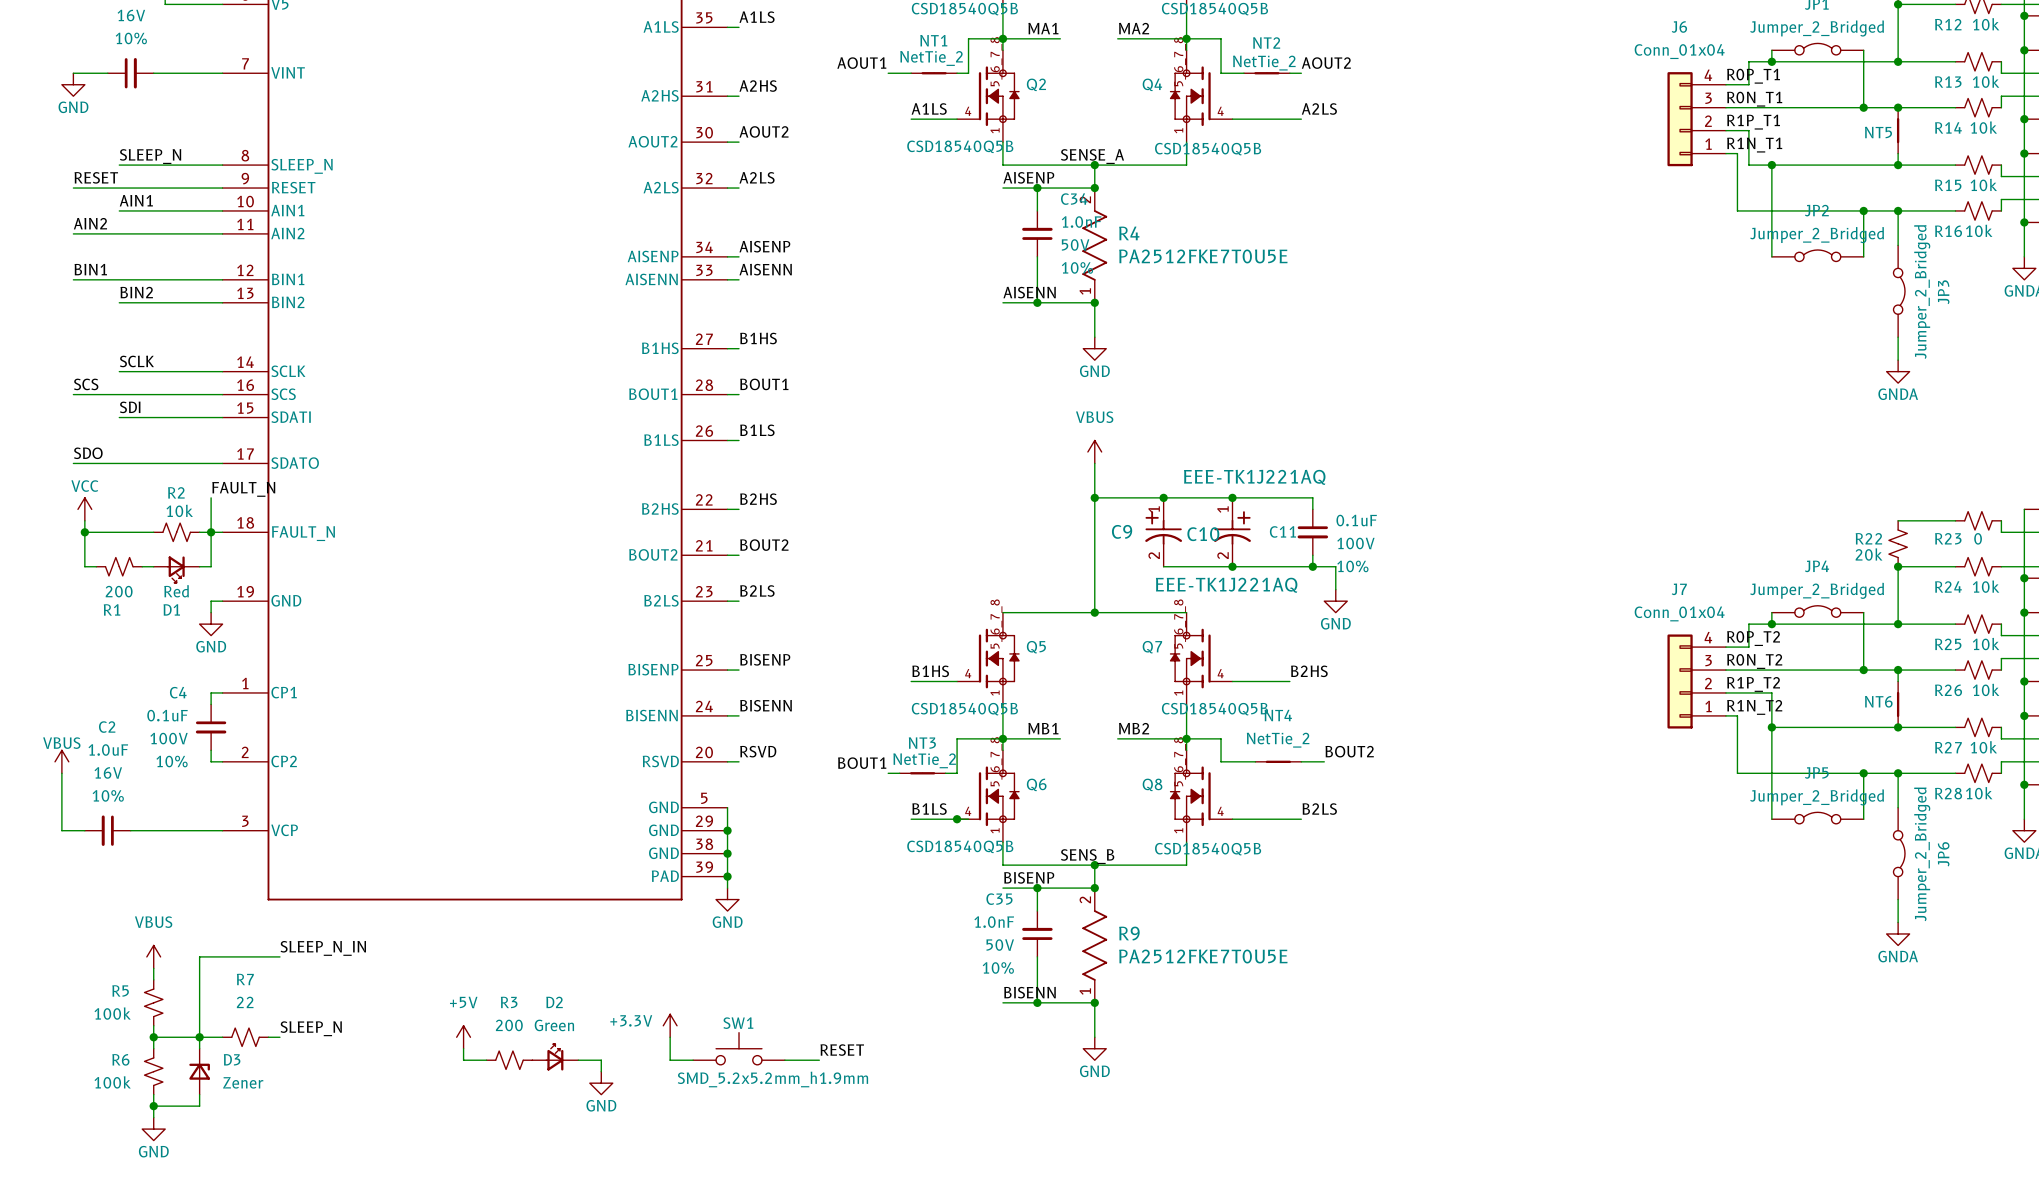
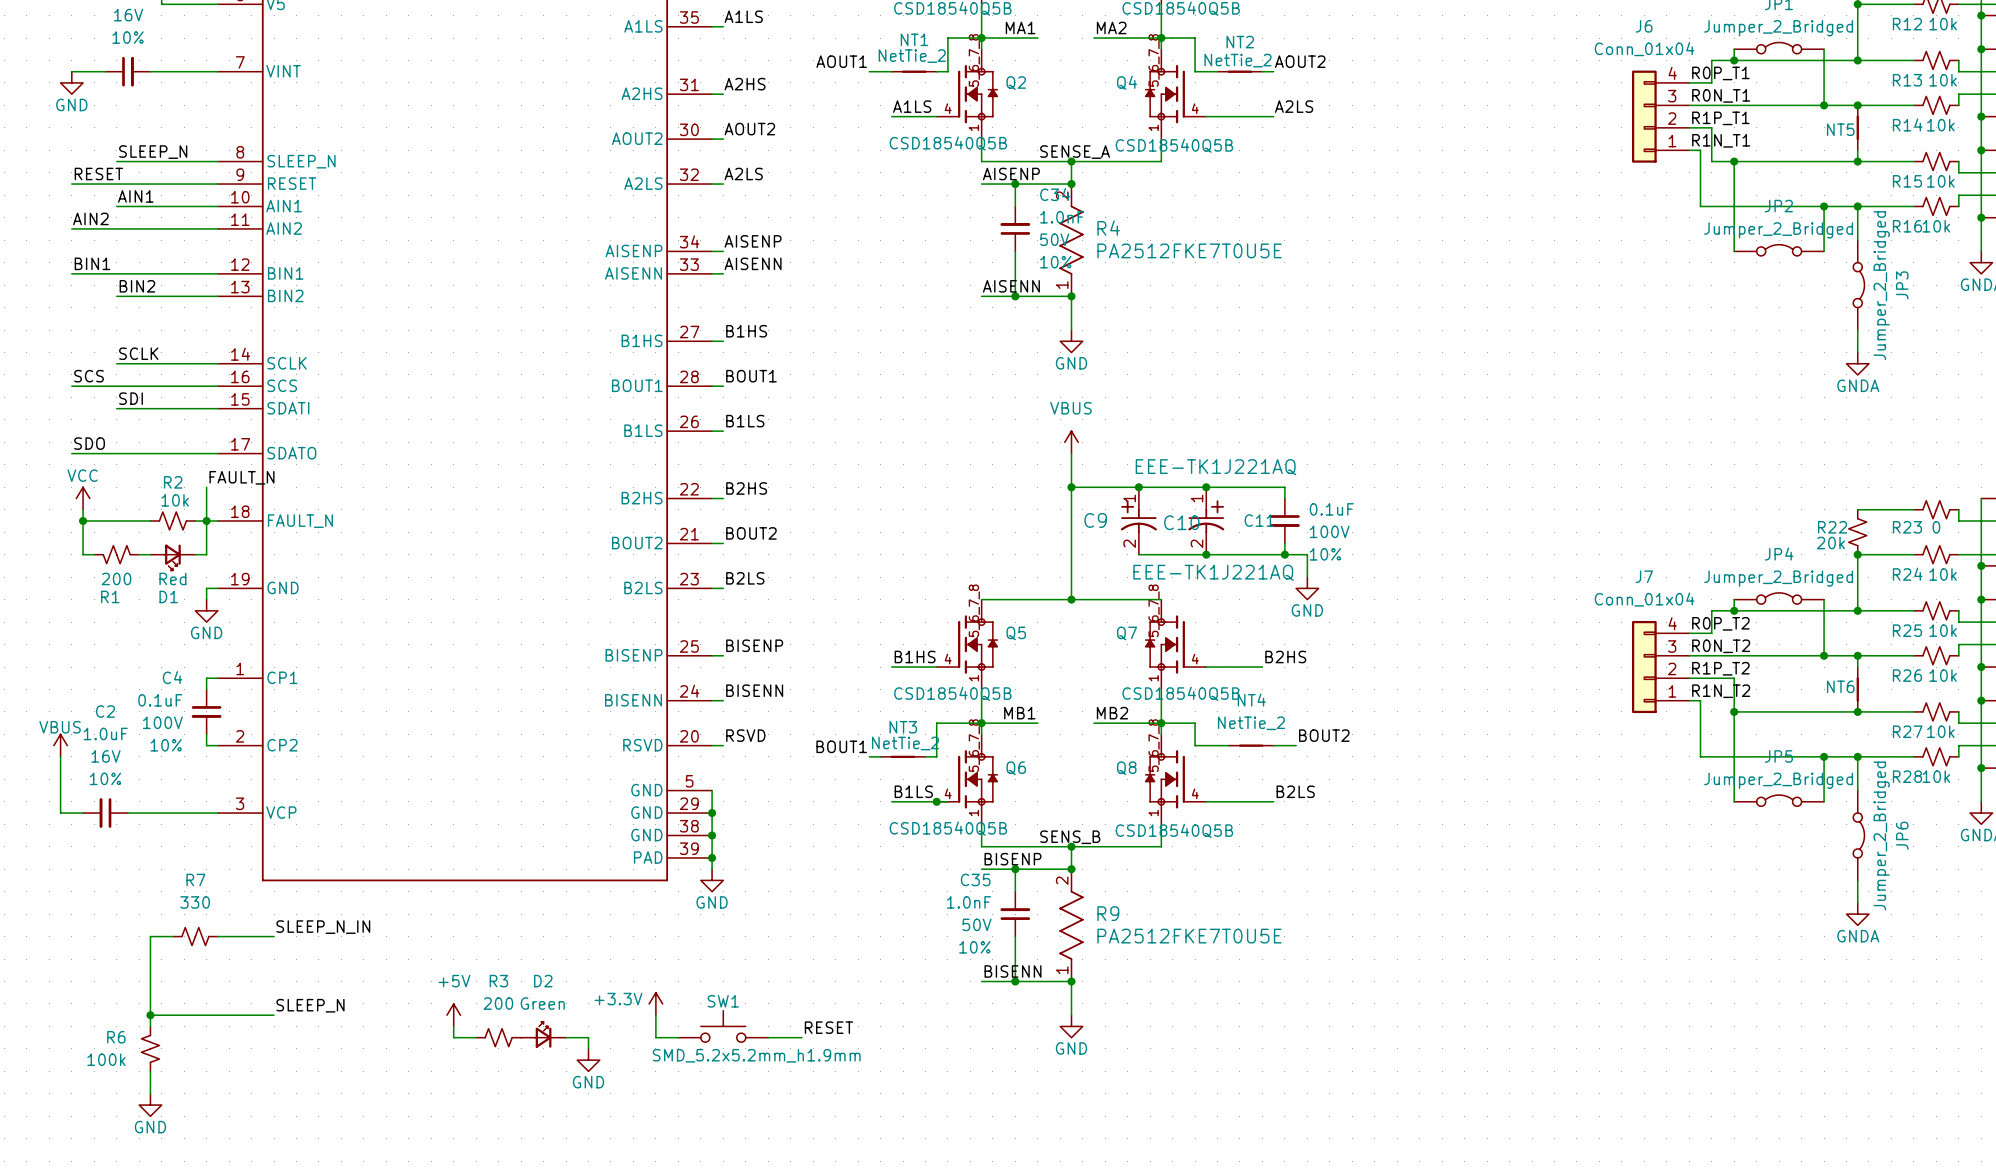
power symbol: VBUS (153, 956) -> none
wire: none -> (172, 936) (150, 936) (150, 947)
wire: (222, 956) (199, 956) (199, 1048) -> none
R5: 100k (153, 1002) -> none
R7 value: 22 (245, 1002) -> 330 (195, 902)
junction: (199, 1037) -> none
R7 position: (245, 1037) -> (195, 936)
D3: Zener (199, 1071) -> none
wire: (199, 1094) (199, 1106) (153, 1106) -> none
junction: (153, 1106) -> none

